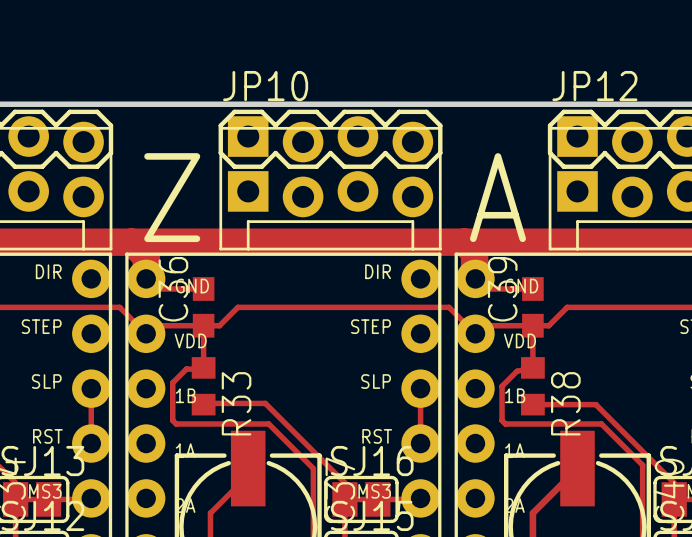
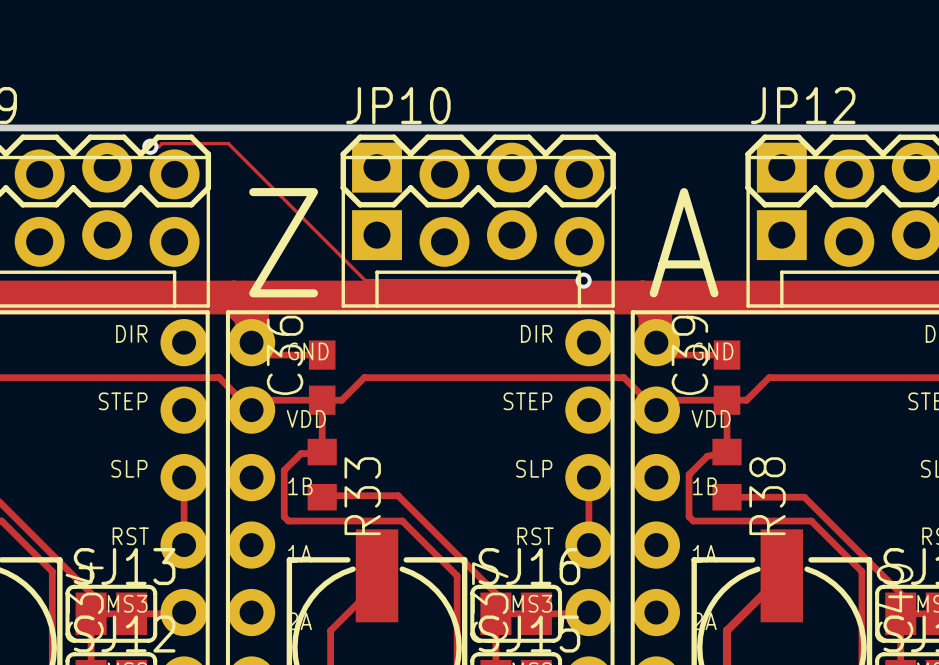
track: none -> (150, 146) (158, 146) (161, 143) (228, 143) (365, 280) (583, 280)
via: none -> (150, 146)
via: none -> (583, 280)

